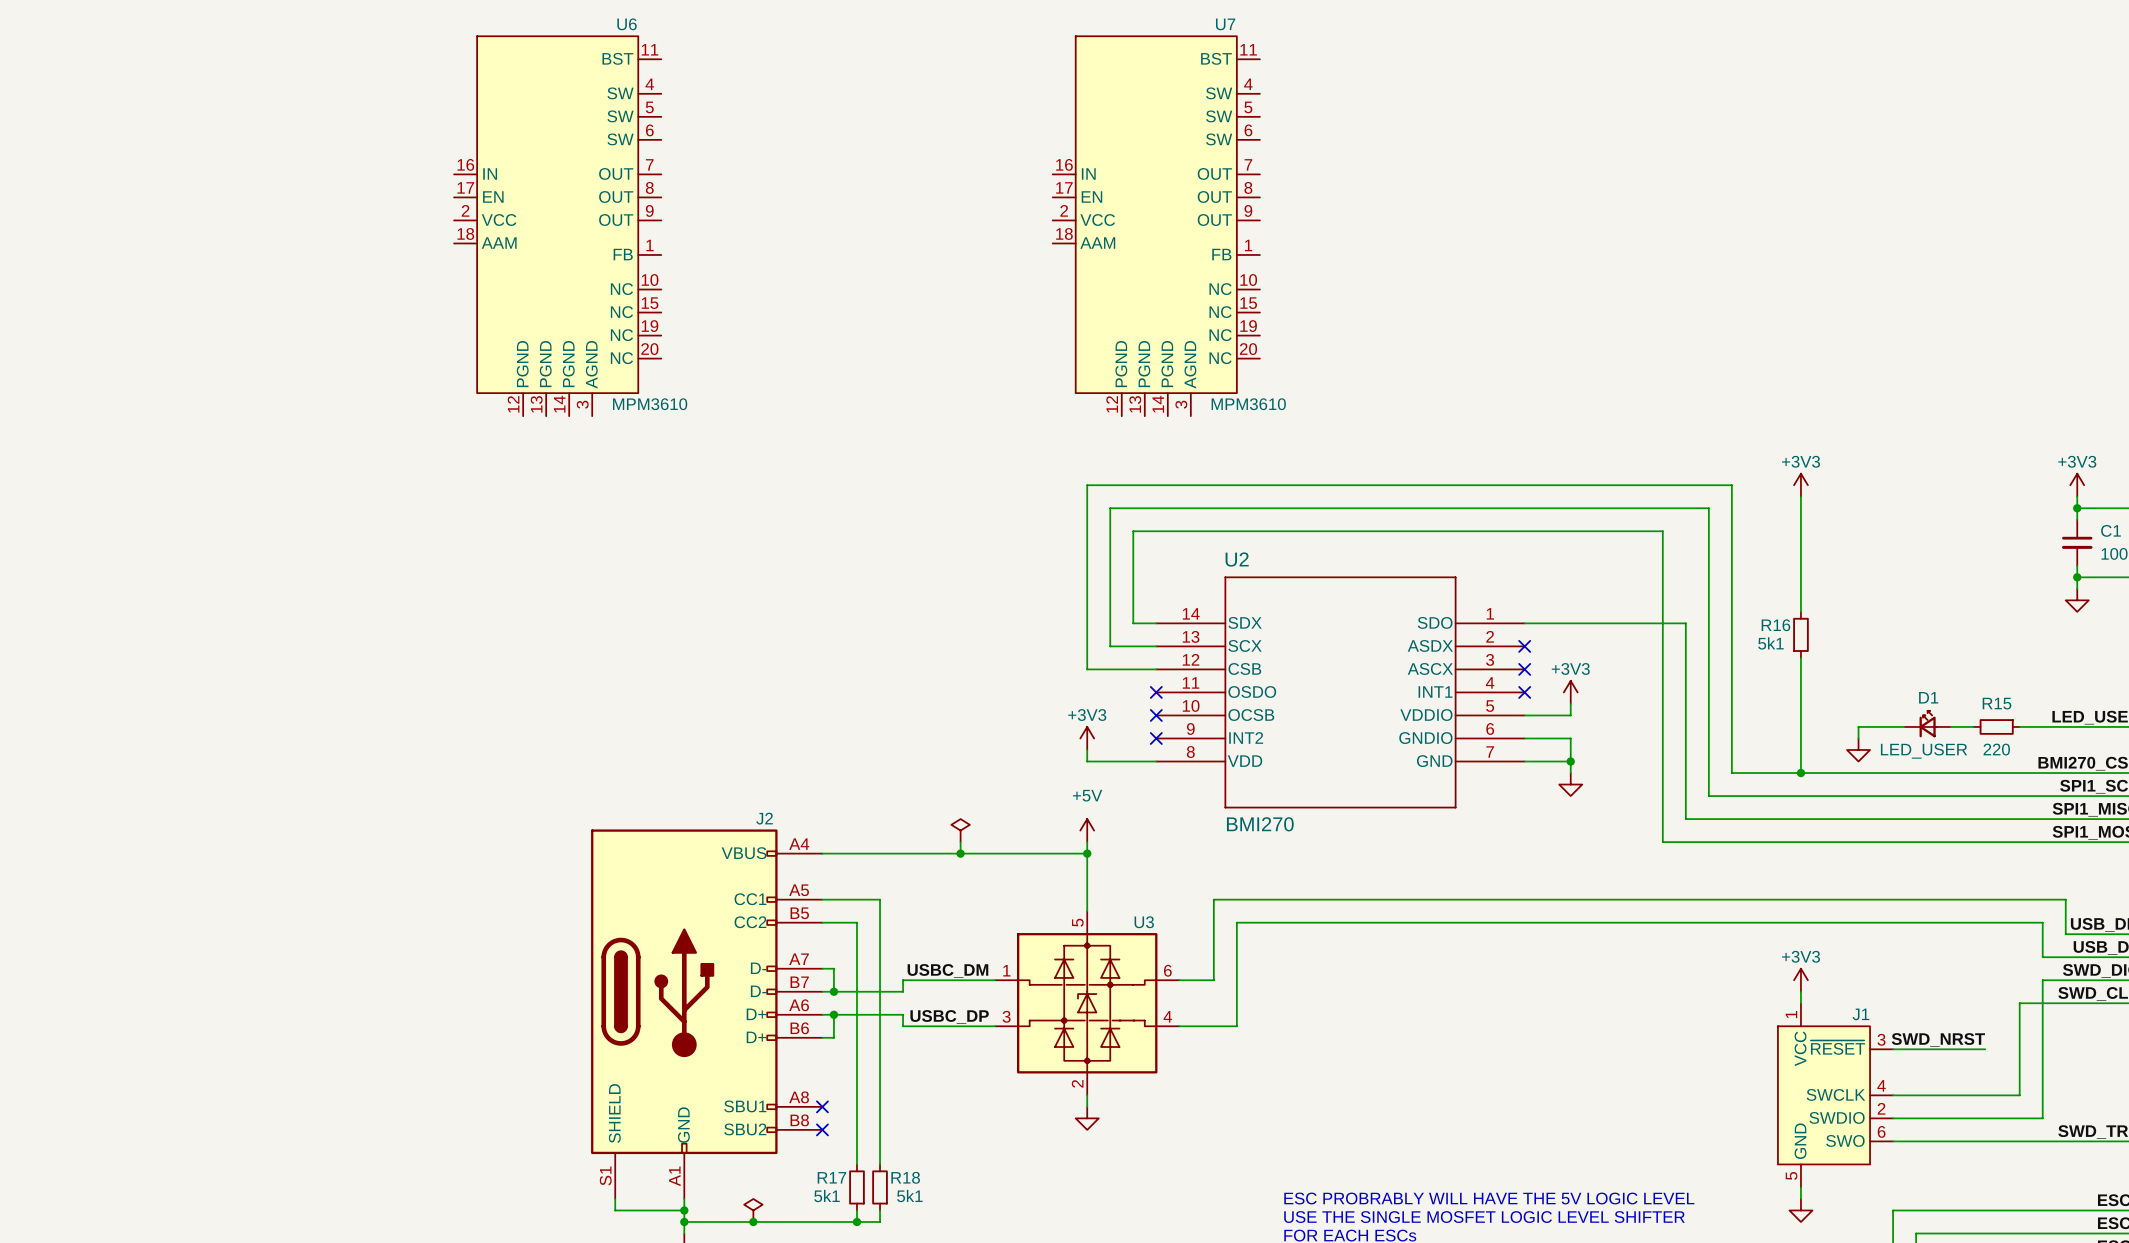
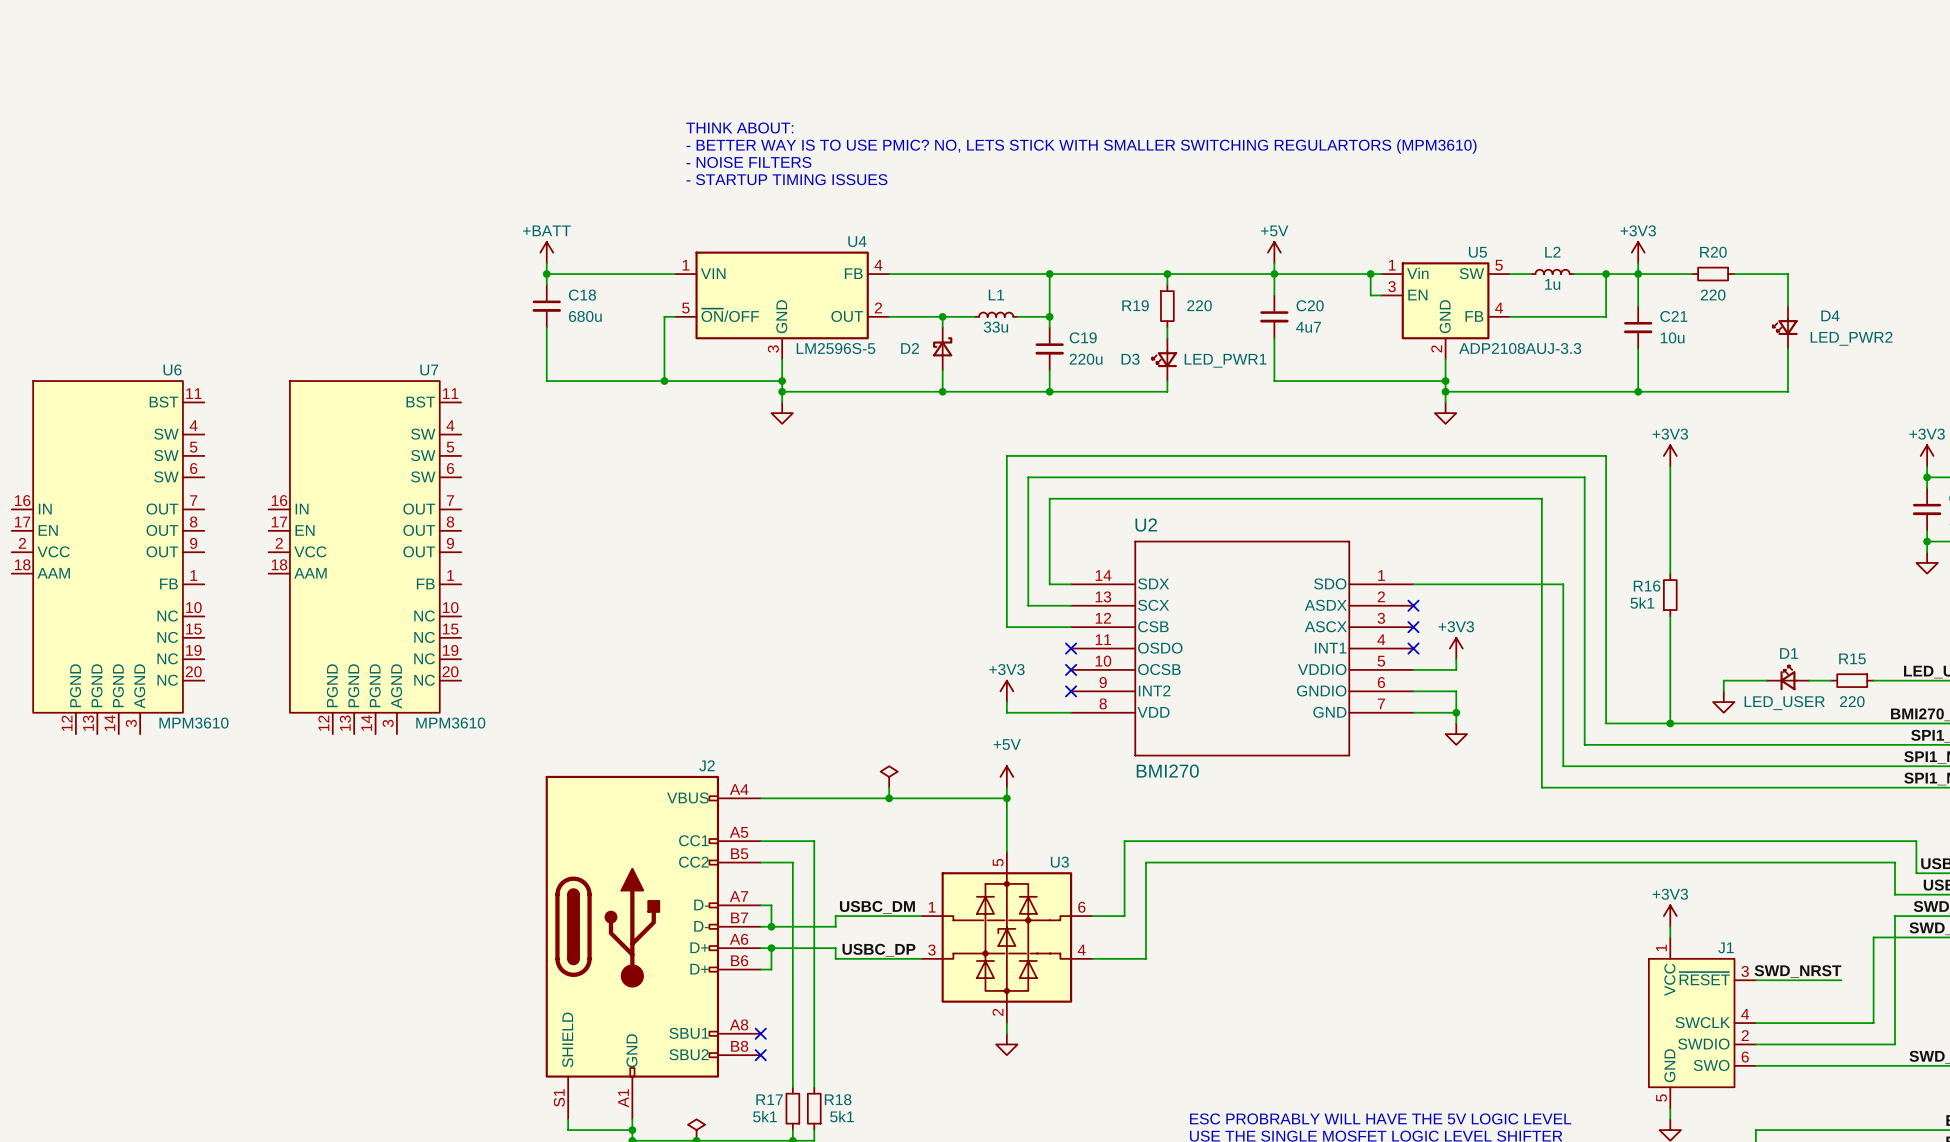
text: none -> THINK ABOUT: (739, 127)
text: none -> - BETTER WAY IS TO USE PMIC? NO, LETS STICK WITH SMALLER SWITCHING REGULARTORS (MPM3610) (1081, 146)
text: none -> - NOISE FILTERS (748, 162)
text: none -> - STARTUP TIMING ISSUES (786, 179)
U6 position: (557, 226) -> (108, 557)
U7 position: (1156, 226) -> (364, 557)
power symbol: none -> +BATT (546, 252)
power symbol: none -> +5V (1274, 252)
power symbol: none -> +3V3 (1638, 252)
wire: none -> (1274, 263) (1274, 295)
wire: none -> (1638, 263) (1638, 306)
L2: none -> 1u (1552, 271)
wire: none -> (546, 274) (675, 274)
junction: none -> (546, 274)
wire: none -> (889, 274) (1381, 274)
junction: none -> (1049, 274)
wire: none -> (1167, 274) (1167, 284)
junction: none -> (1167, 274)
junction: none -> (1274, 274)
wire: none -> (1370, 274) (1370, 295) (1381, 295)
junction: none -> (1370, 274)
wire: none -> (1509, 274) (1531, 274)
wire: none -> (1573, 274) (1691, 274)
wire: none -> (1606, 274) (1606, 316) (1509, 316)
junction: none -> (1606, 274)
junction: none -> (1638, 274)
R20: none -> 220 (1713, 274)
wire: none -> (1734, 274) (1787, 274) (1787, 306)
U4: none -> LM2596S-5 (782, 305)
C18: none -> 680u (546, 306)
R19: none -> 220 (1167, 306)
U5: none -> ADP2108AUJ-3.3 (1445, 310)
L1: none -> 33u (996, 314)
wire: none -> (675, 316) (664, 316) (664, 381)
wire: none -> (889, 316) (974, 316)
wire: none -> (942, 316) (942, 327)
junction: none -> (942, 316)
junction: none -> (1049, 316)
C20: none -> 4u7 (1274, 316)
wire: none -> (546, 327) (546, 381) (782, 381)
wire: none -> (1167, 327) (1167, 338)
C21: none -> 10u (1638, 327)
D4: none -> LED_PWR2 (1785, 327)
wire: none -> (1274, 338) (1274, 381) (1445, 381)
D2: none -> (942, 348)
C19: none -> 220u (1049, 348)
wire: none -> (1638, 348) (1638, 391)
wire: none -> (1787, 348) (1787, 391) (1445, 391)
wire: none -> (782, 359) (782, 402)
D3: none -> LED_PWR1 (1164, 359)
wire: none -> (1445, 359) (1445, 402)
wire: none -> (942, 370) (942, 391)
wire: none -> (1049, 370) (1049, 391)
junction: none -> (664, 381)
junction: none -> (782, 381)
wire: none -> (1167, 381) (1167, 391) (782, 391)
junction: none -> (1445, 381)
junction: none -> (782, 391)
junction: none -> (942, 391)
junction: none -> (1049, 391)
junction: none -> (1445, 391)
junction: none -> (1638, 391)
power symbol: none -> (782, 413)
power symbol: none -> (1445, 413)

